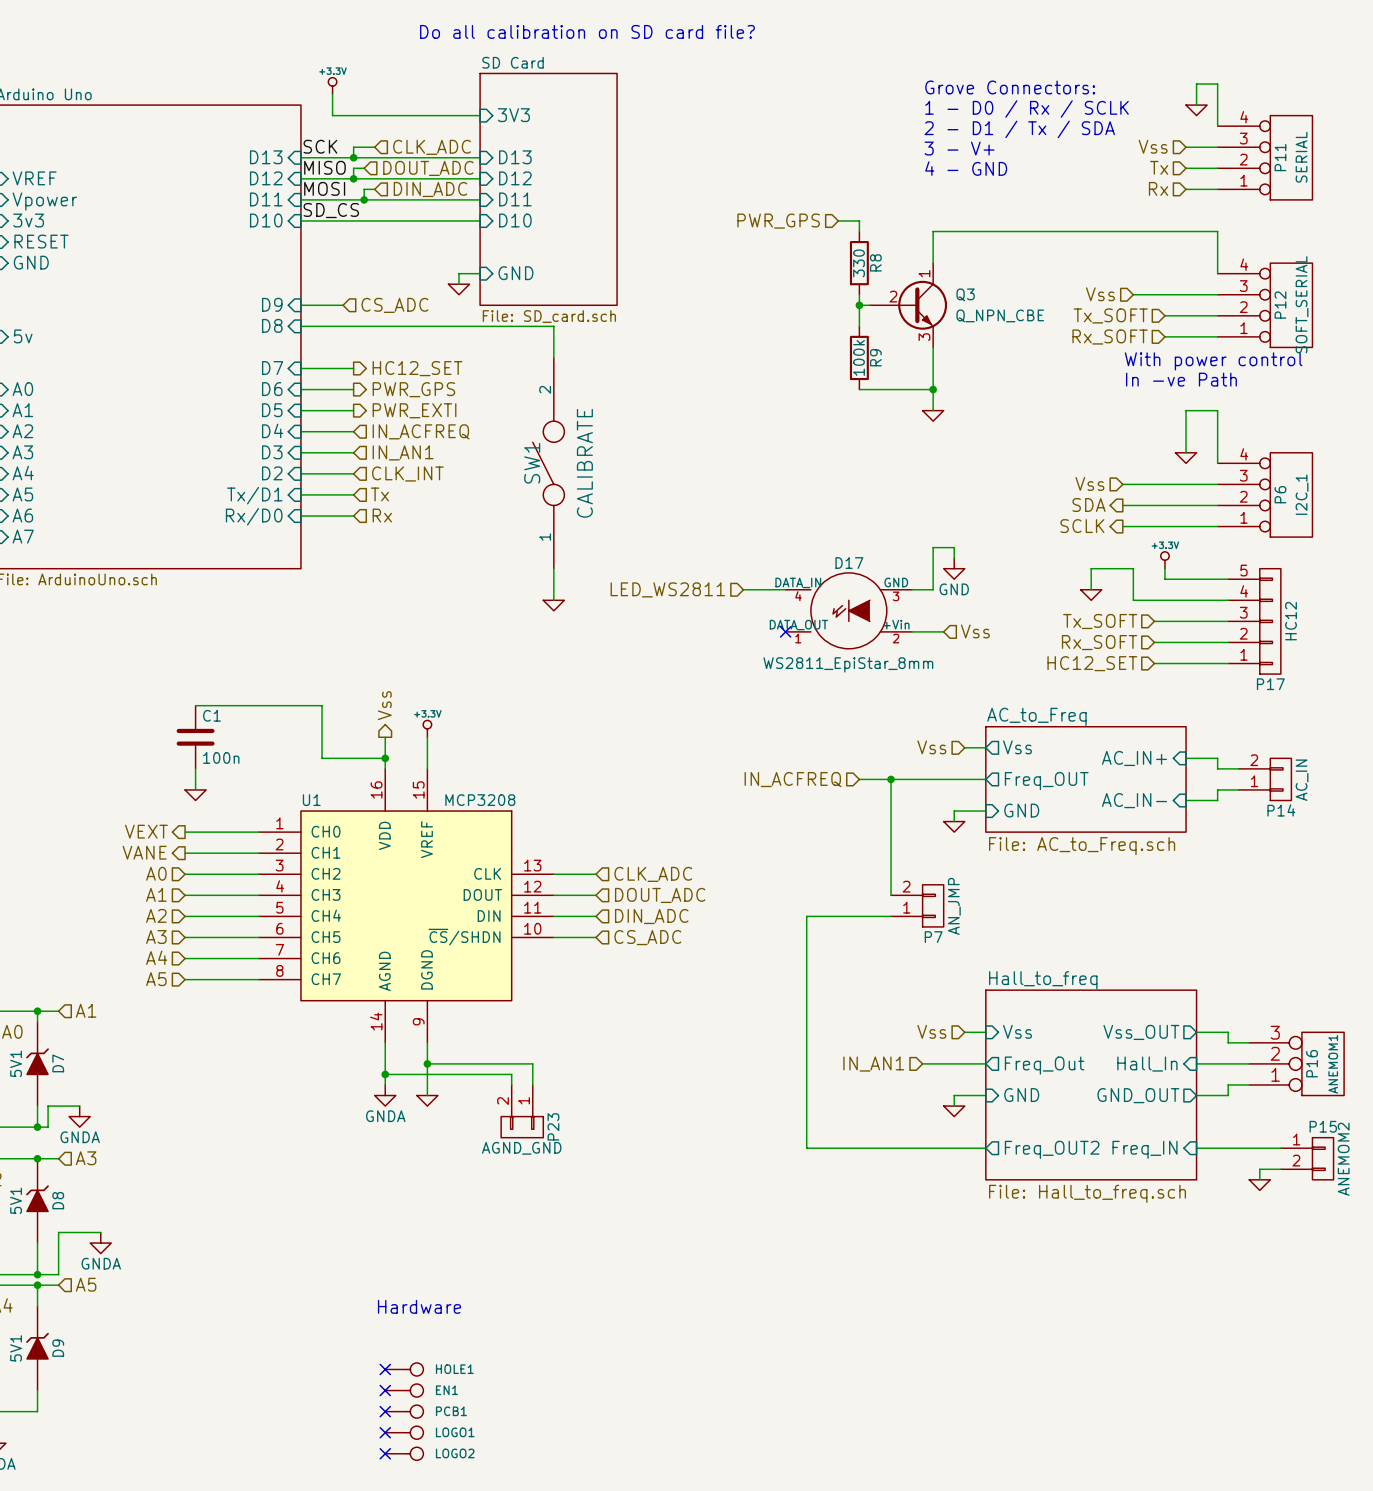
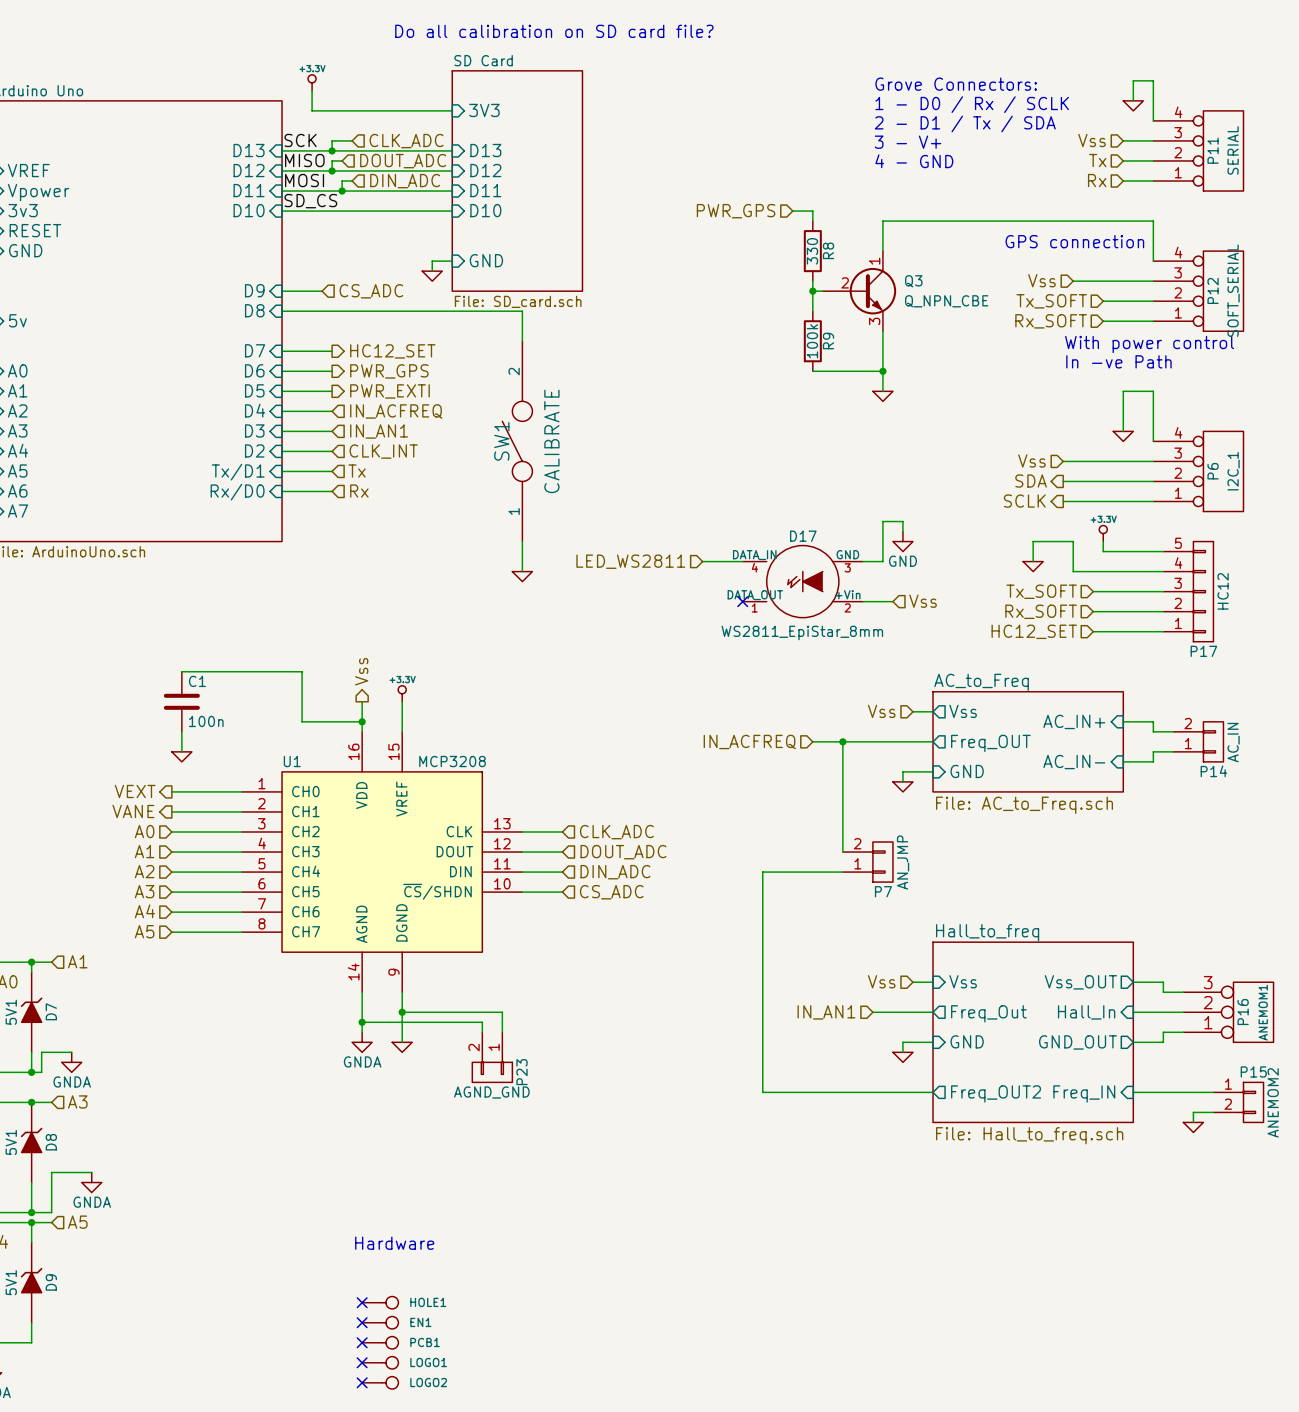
text: none -> GPS connection (1074, 241)

